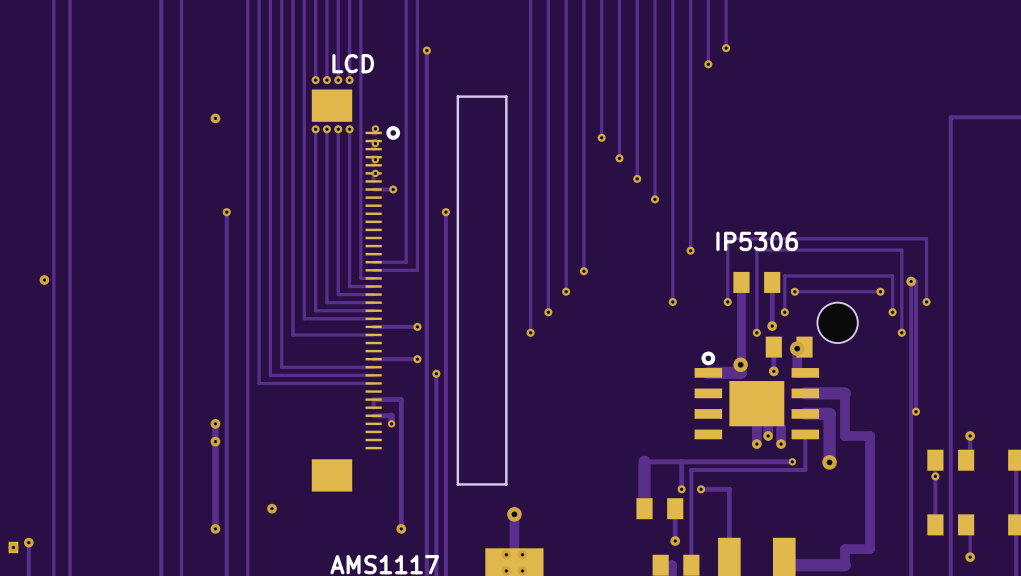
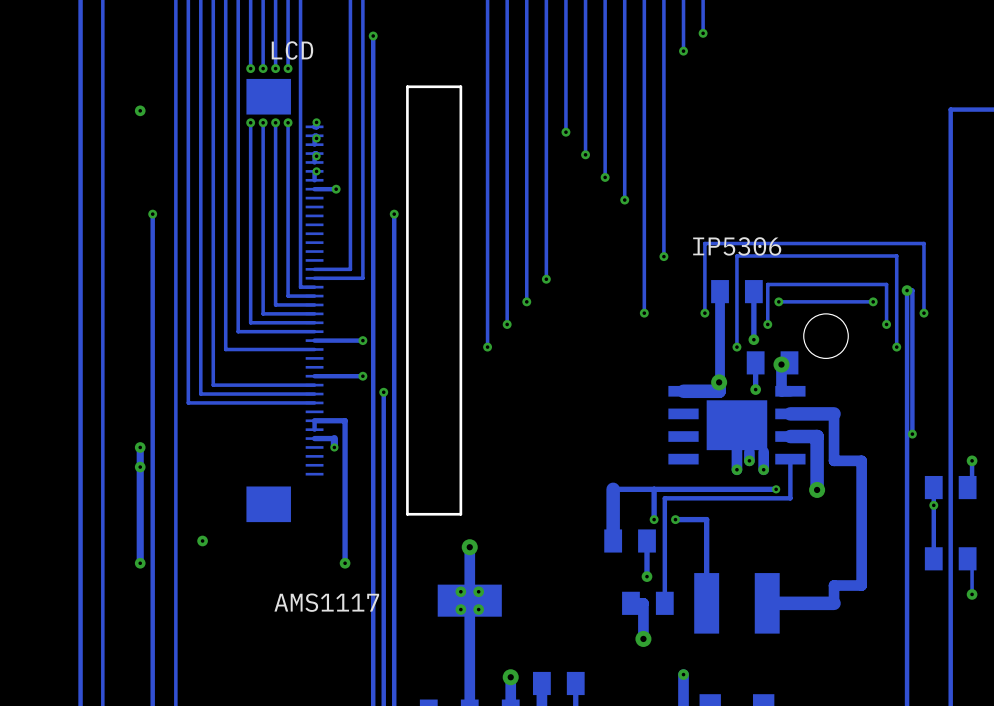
part footprint: [311, 89, 401, 492] -> [246, 78, 324, 523]
part footprint: [694, 351, 820, 440] -> [668, 385, 806, 465]

